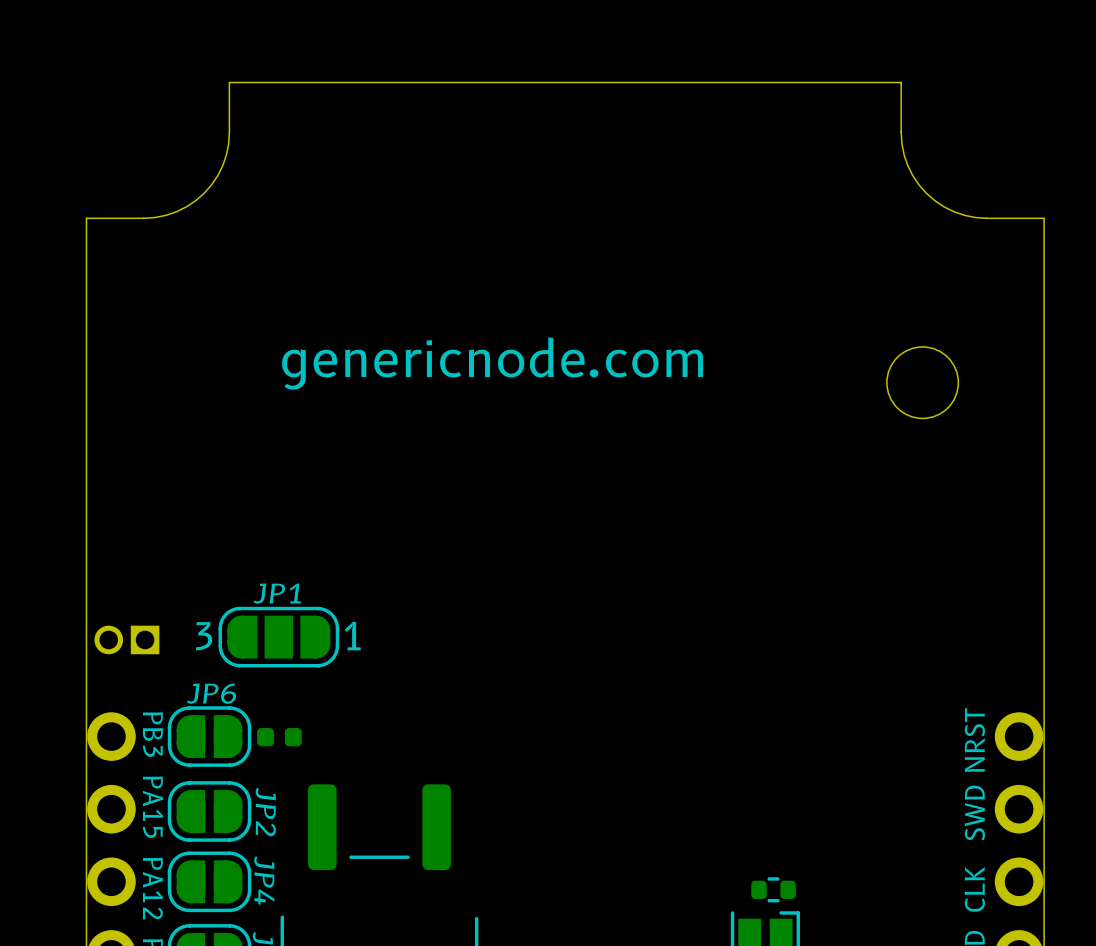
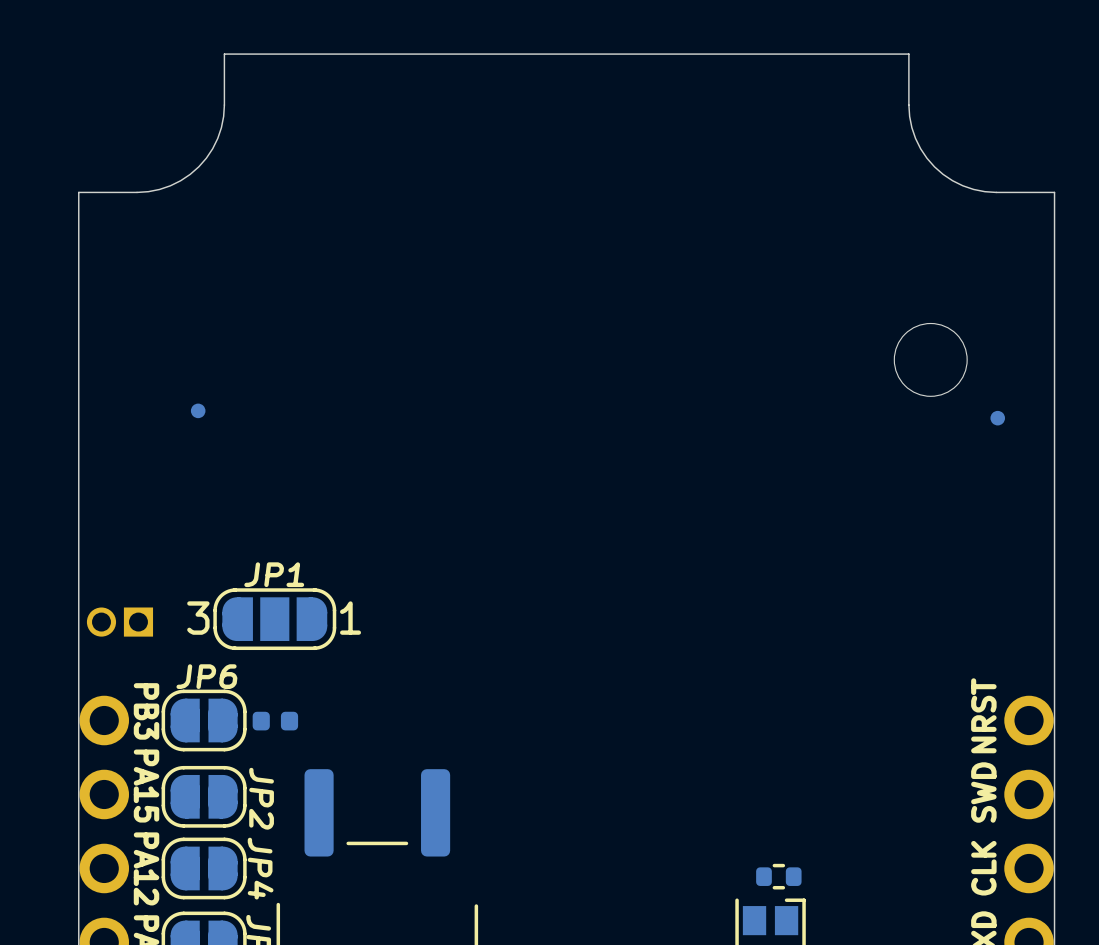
text: genericnode.com (492, 363) -> none
part: none -> (198, 410)
part: none -> (997, 418)

